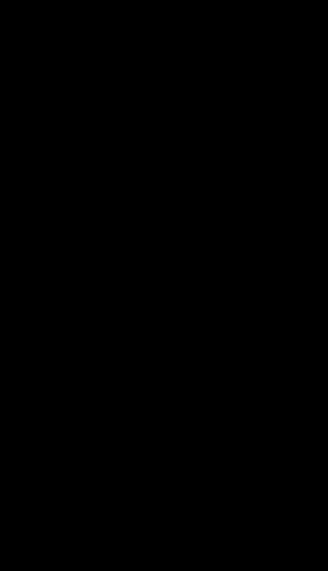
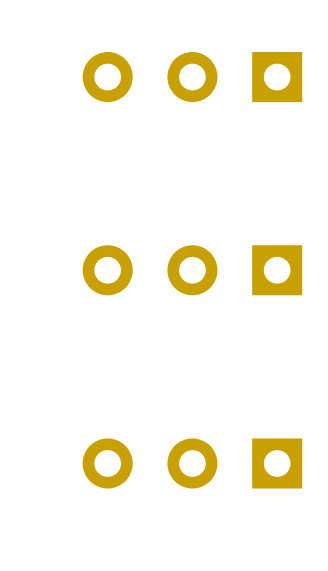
part: none -> (192, 77)
part: none -> (192, 270)
part: none -> (192, 463)

